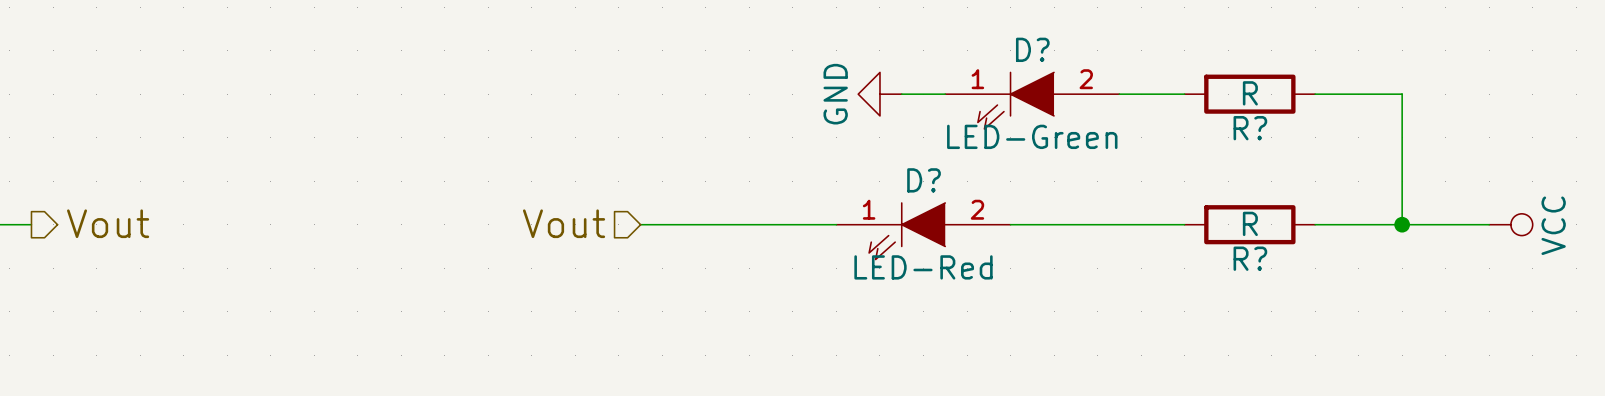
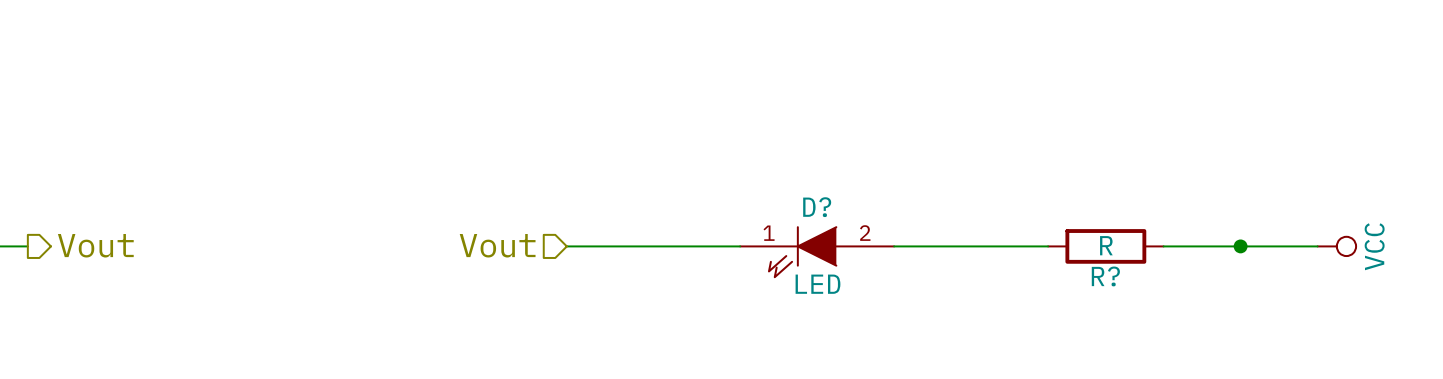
power symbol: GND (879, 94) -> none
wire: (901, 94) (945, 94) -> none
wire: (1119, 94) (1184, 94) -> none
R?: R (1249, 94) -> none
wire: (1315, 94) (1402, 94) (1402, 224) -> none
D?: LED-Green (1032, 100) -> none
D? value: LED-Red (923, 267) -> LED (817, 284)

